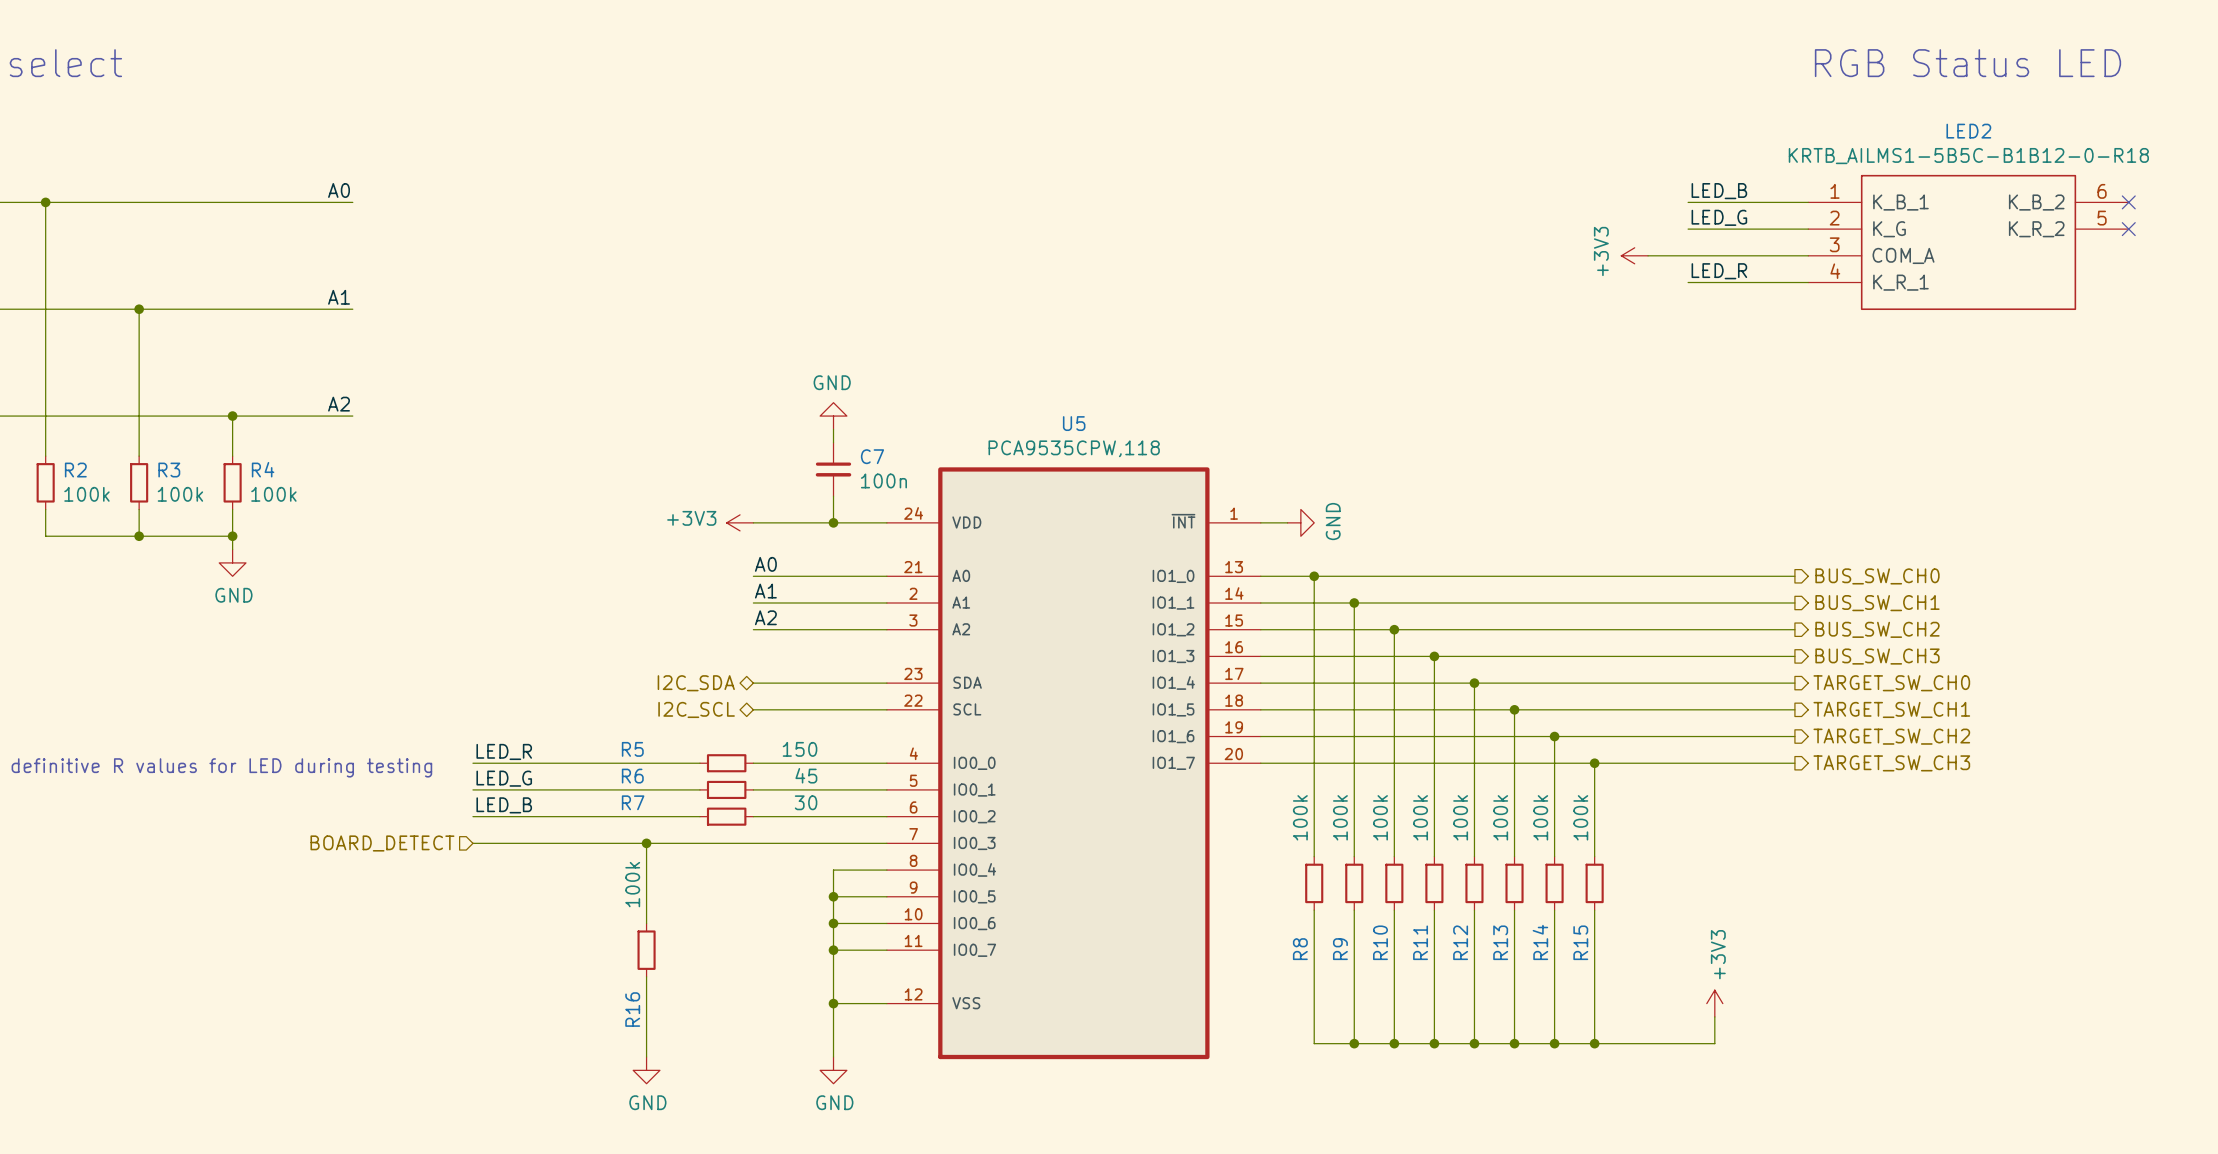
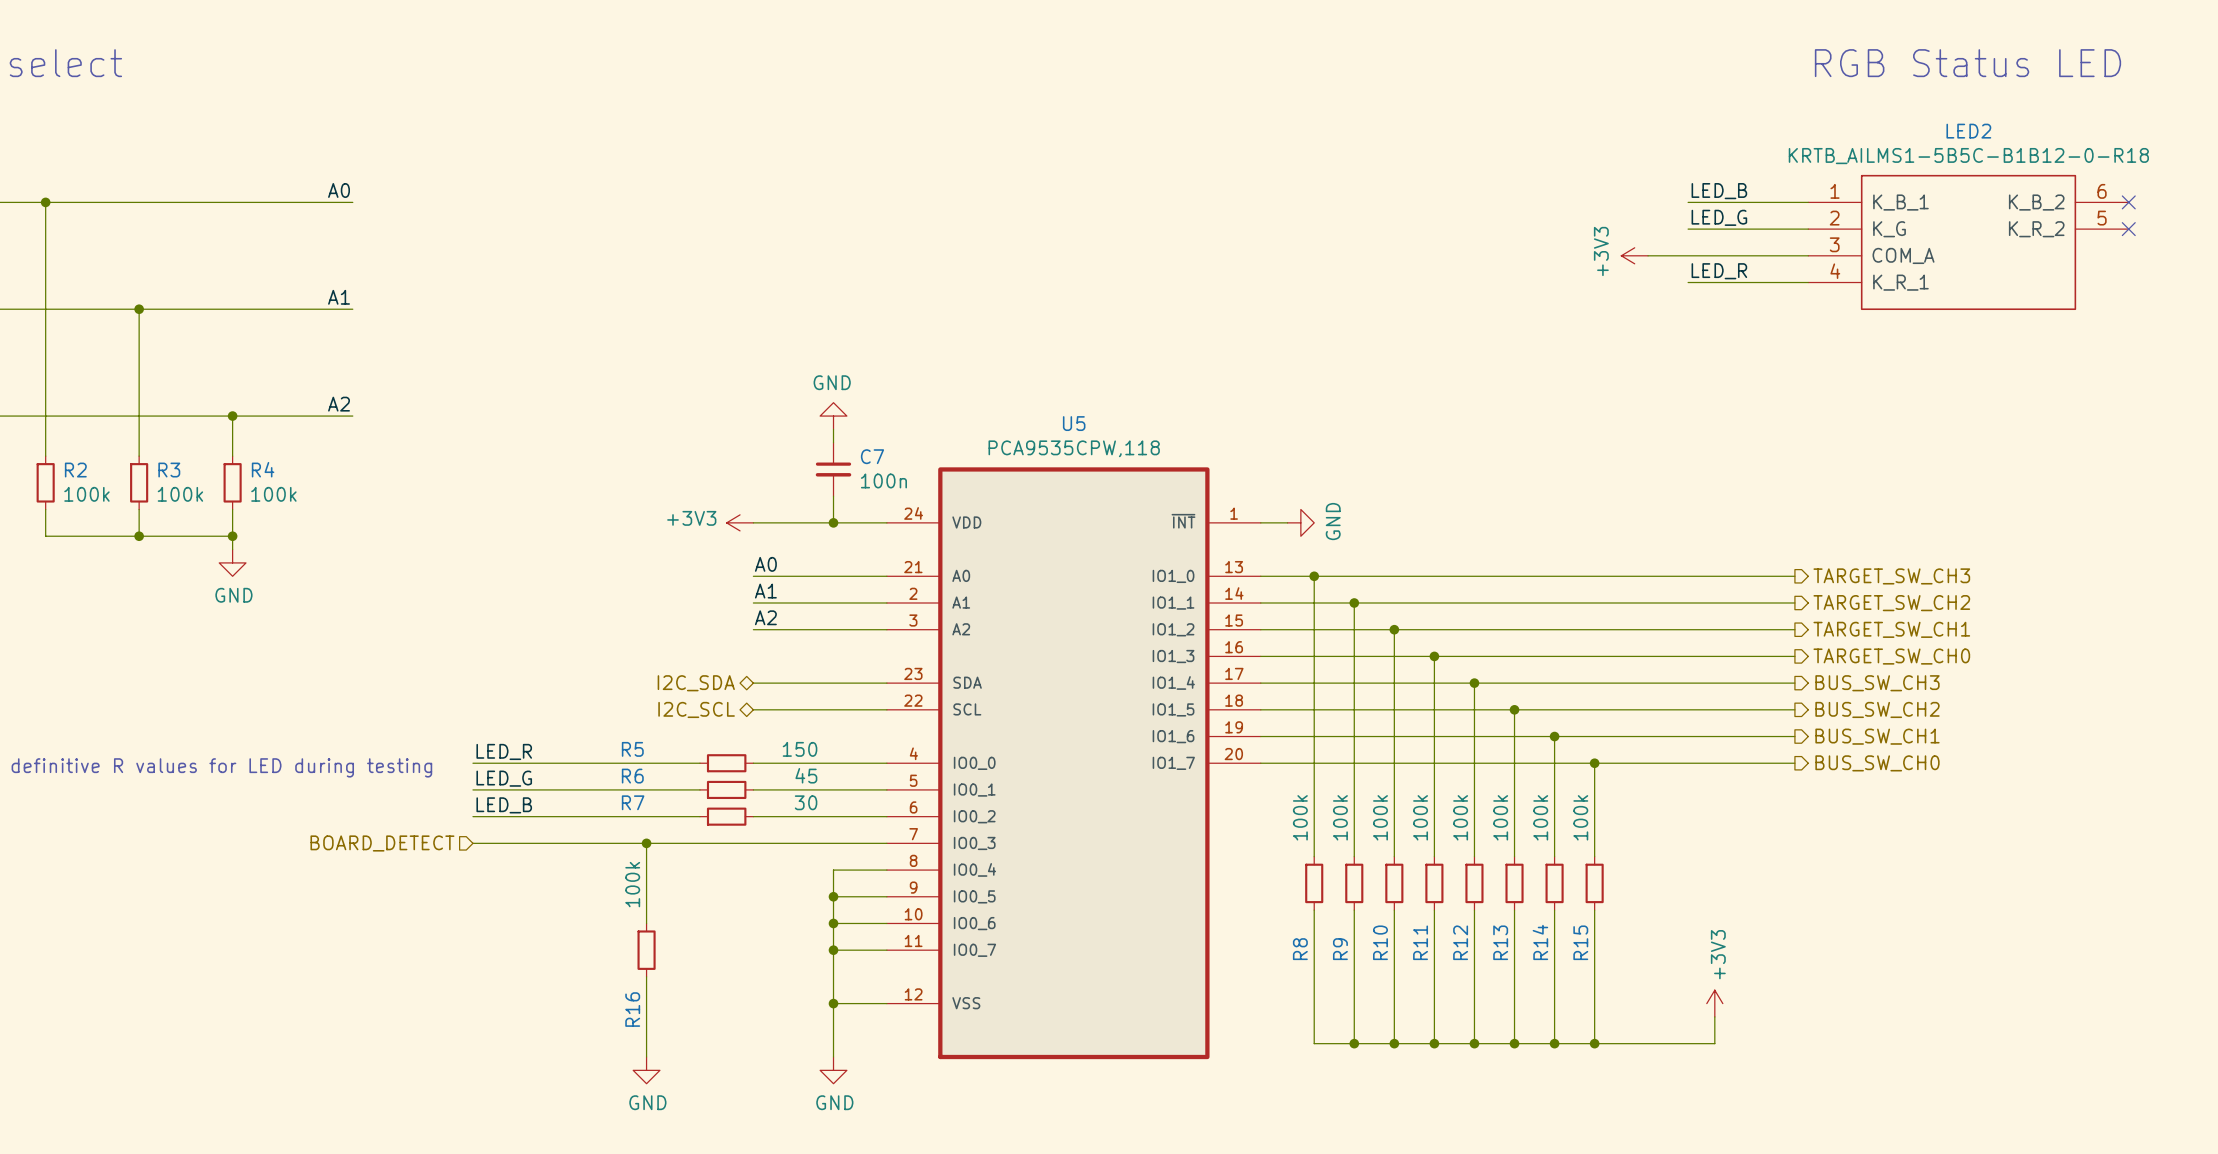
hierarchical label: BUS_SW_CH0 (1877, 576) -> TARGET_SW_CH3 (1891, 576)
hierarchical label: BUS_SW_CH1 (1877, 603) -> TARGET_SW_CH2 (1891, 603)
hierarchical label: BUS_SW_CH2 (1877, 629) -> TARGET_SW_CH1 (1891, 629)
hierarchical label: BUS_SW_CH3 (1877, 656) -> TARGET_SW_CH0 (1891, 656)
hierarchical label: TARGET_SW_CH0 (1891, 683) -> BUS_SW_CH3 (1877, 683)
hierarchical label: TARGET_SW_CH1 (1891, 709) -> BUS_SW_CH2 (1877, 709)
hierarchical label: TARGET_SW_CH2 (1891, 736) -> BUS_SW_CH1 (1877, 736)
hierarchical label: TARGET_SW_CH3 (1891, 763) -> BUS_SW_CH0 (1877, 763)

